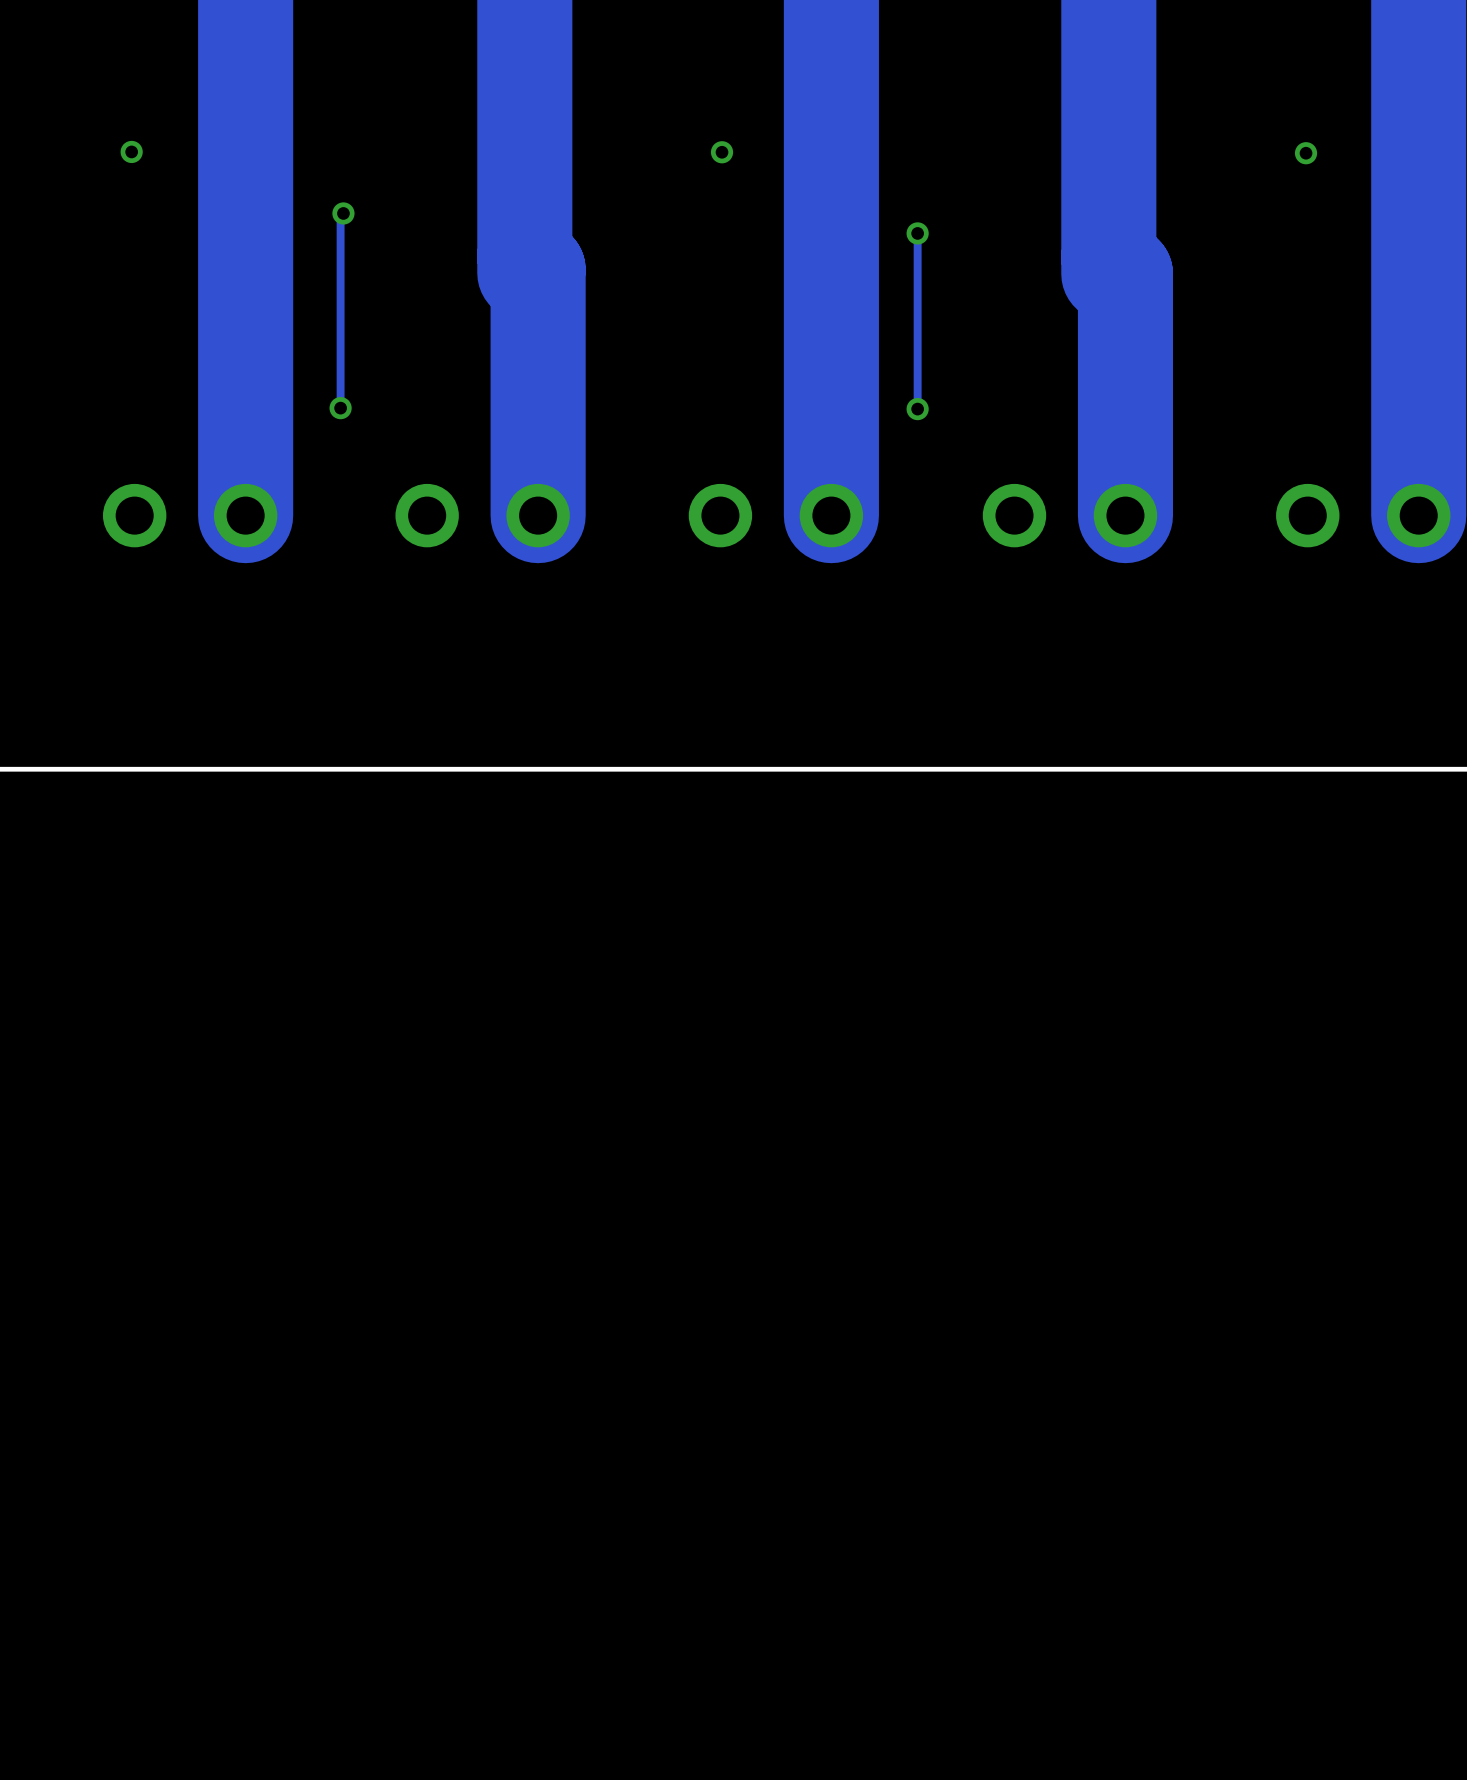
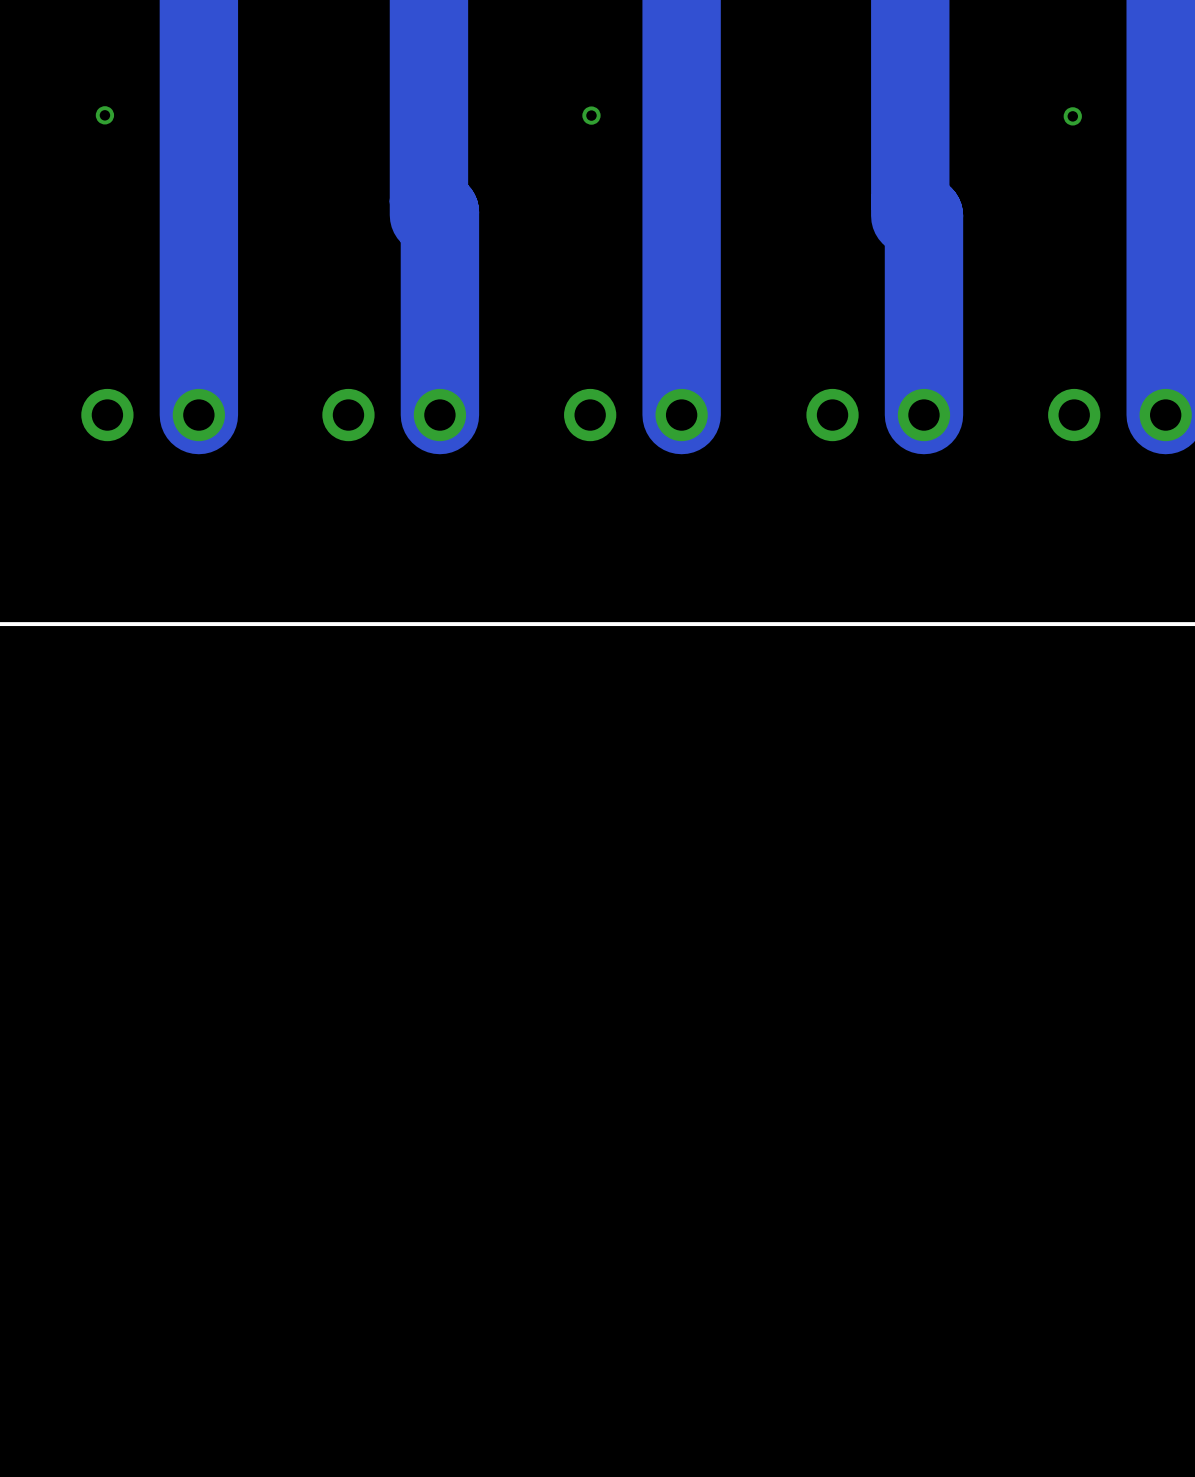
track: (343, 213) (340, 216) (340, 408) -> none
via: (343, 213) -> none
track: (917, 233) (917, 409) -> none
via: (917, 233) -> none
via: (340, 408) -> none
via: (917, 409) -> none

